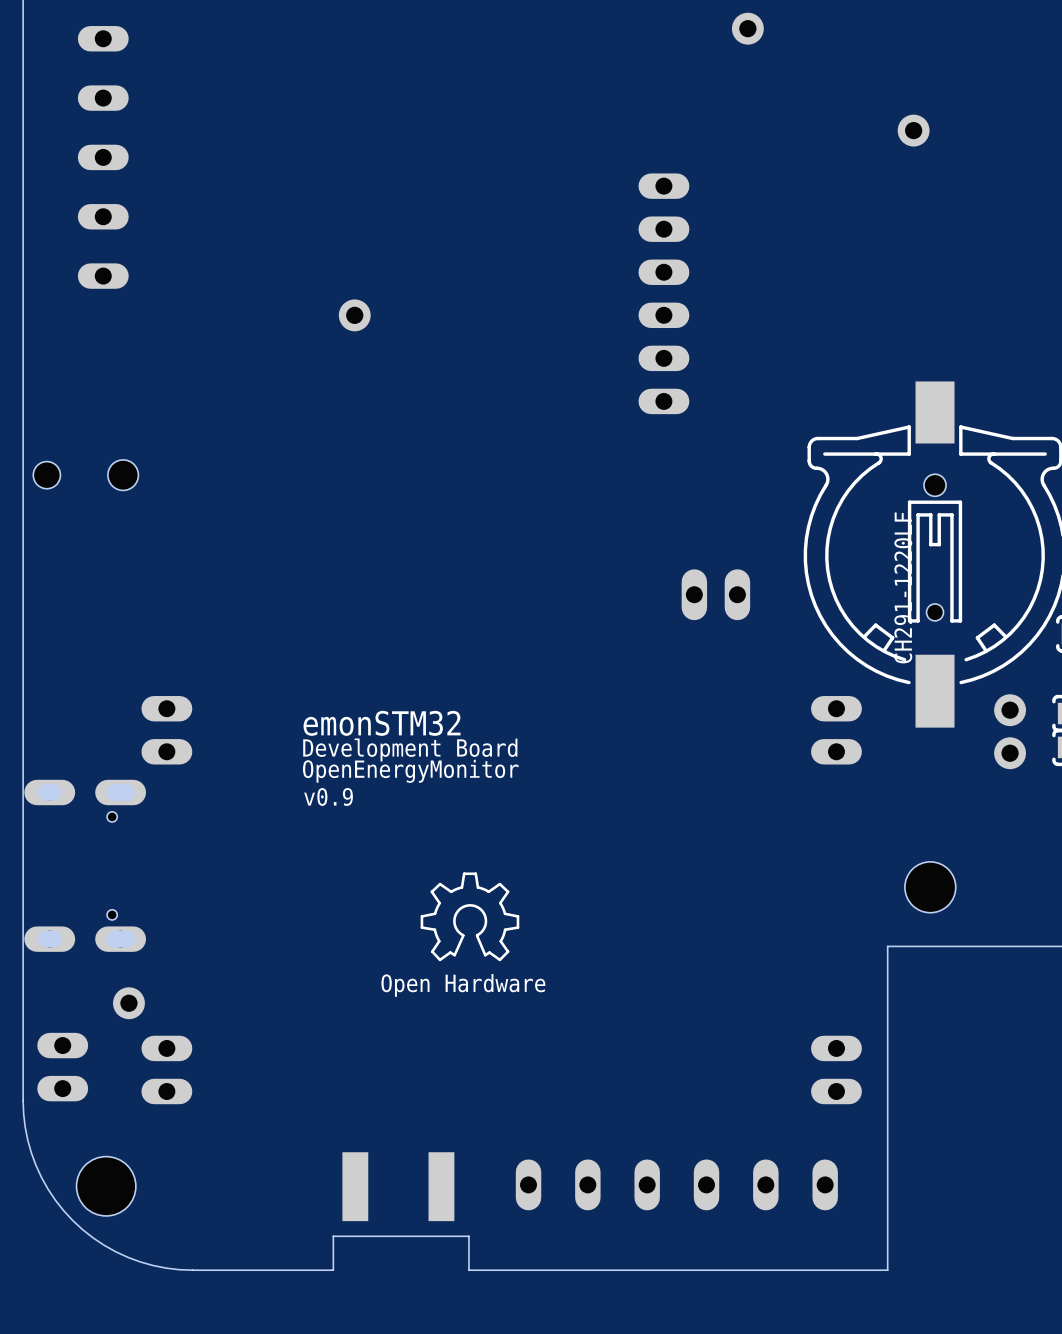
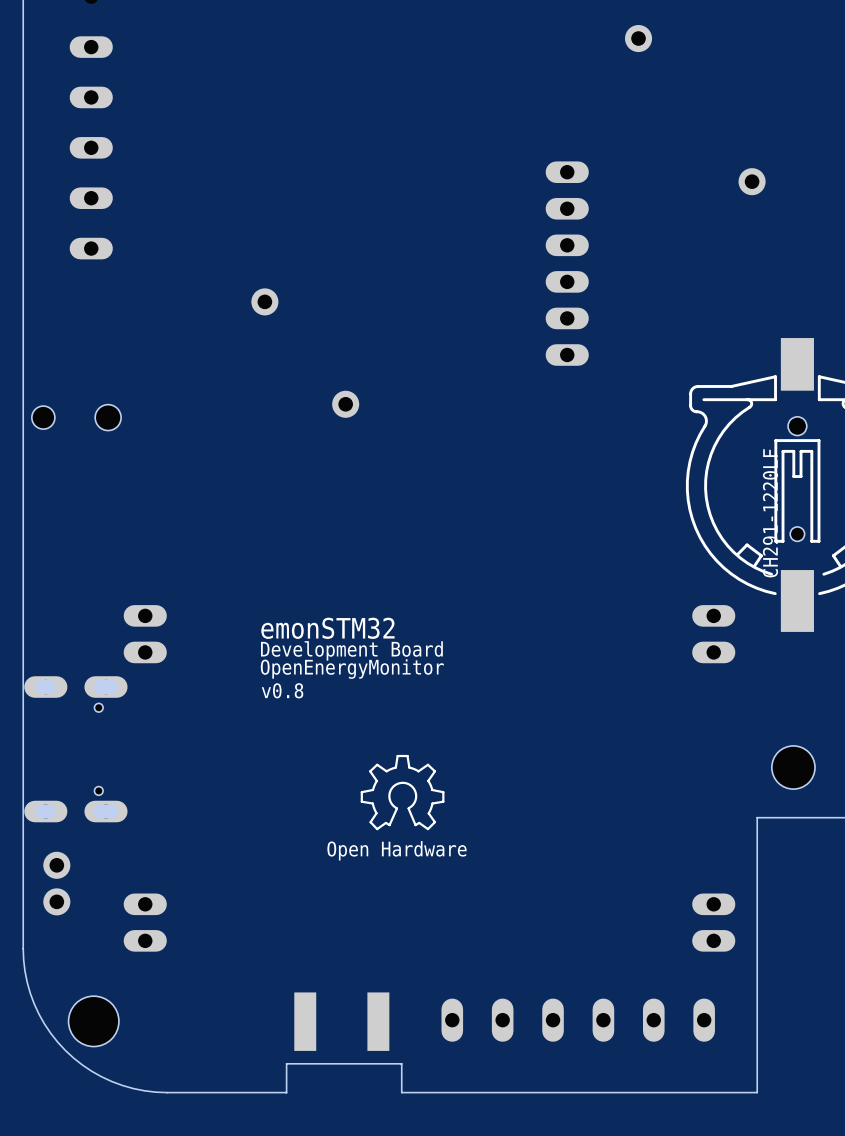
part position: (913, 130) -> (752, 181)
part position: (354, 315) -> (264, 301)
part: none -> (345, 404)
part: (715, 594) -> none
text: v0.9 (328, 796) -> v0.8 (282, 690)
part: (128, 1003) -> none
part: none -> (56, 883)
part: (62, 1067) -> none

